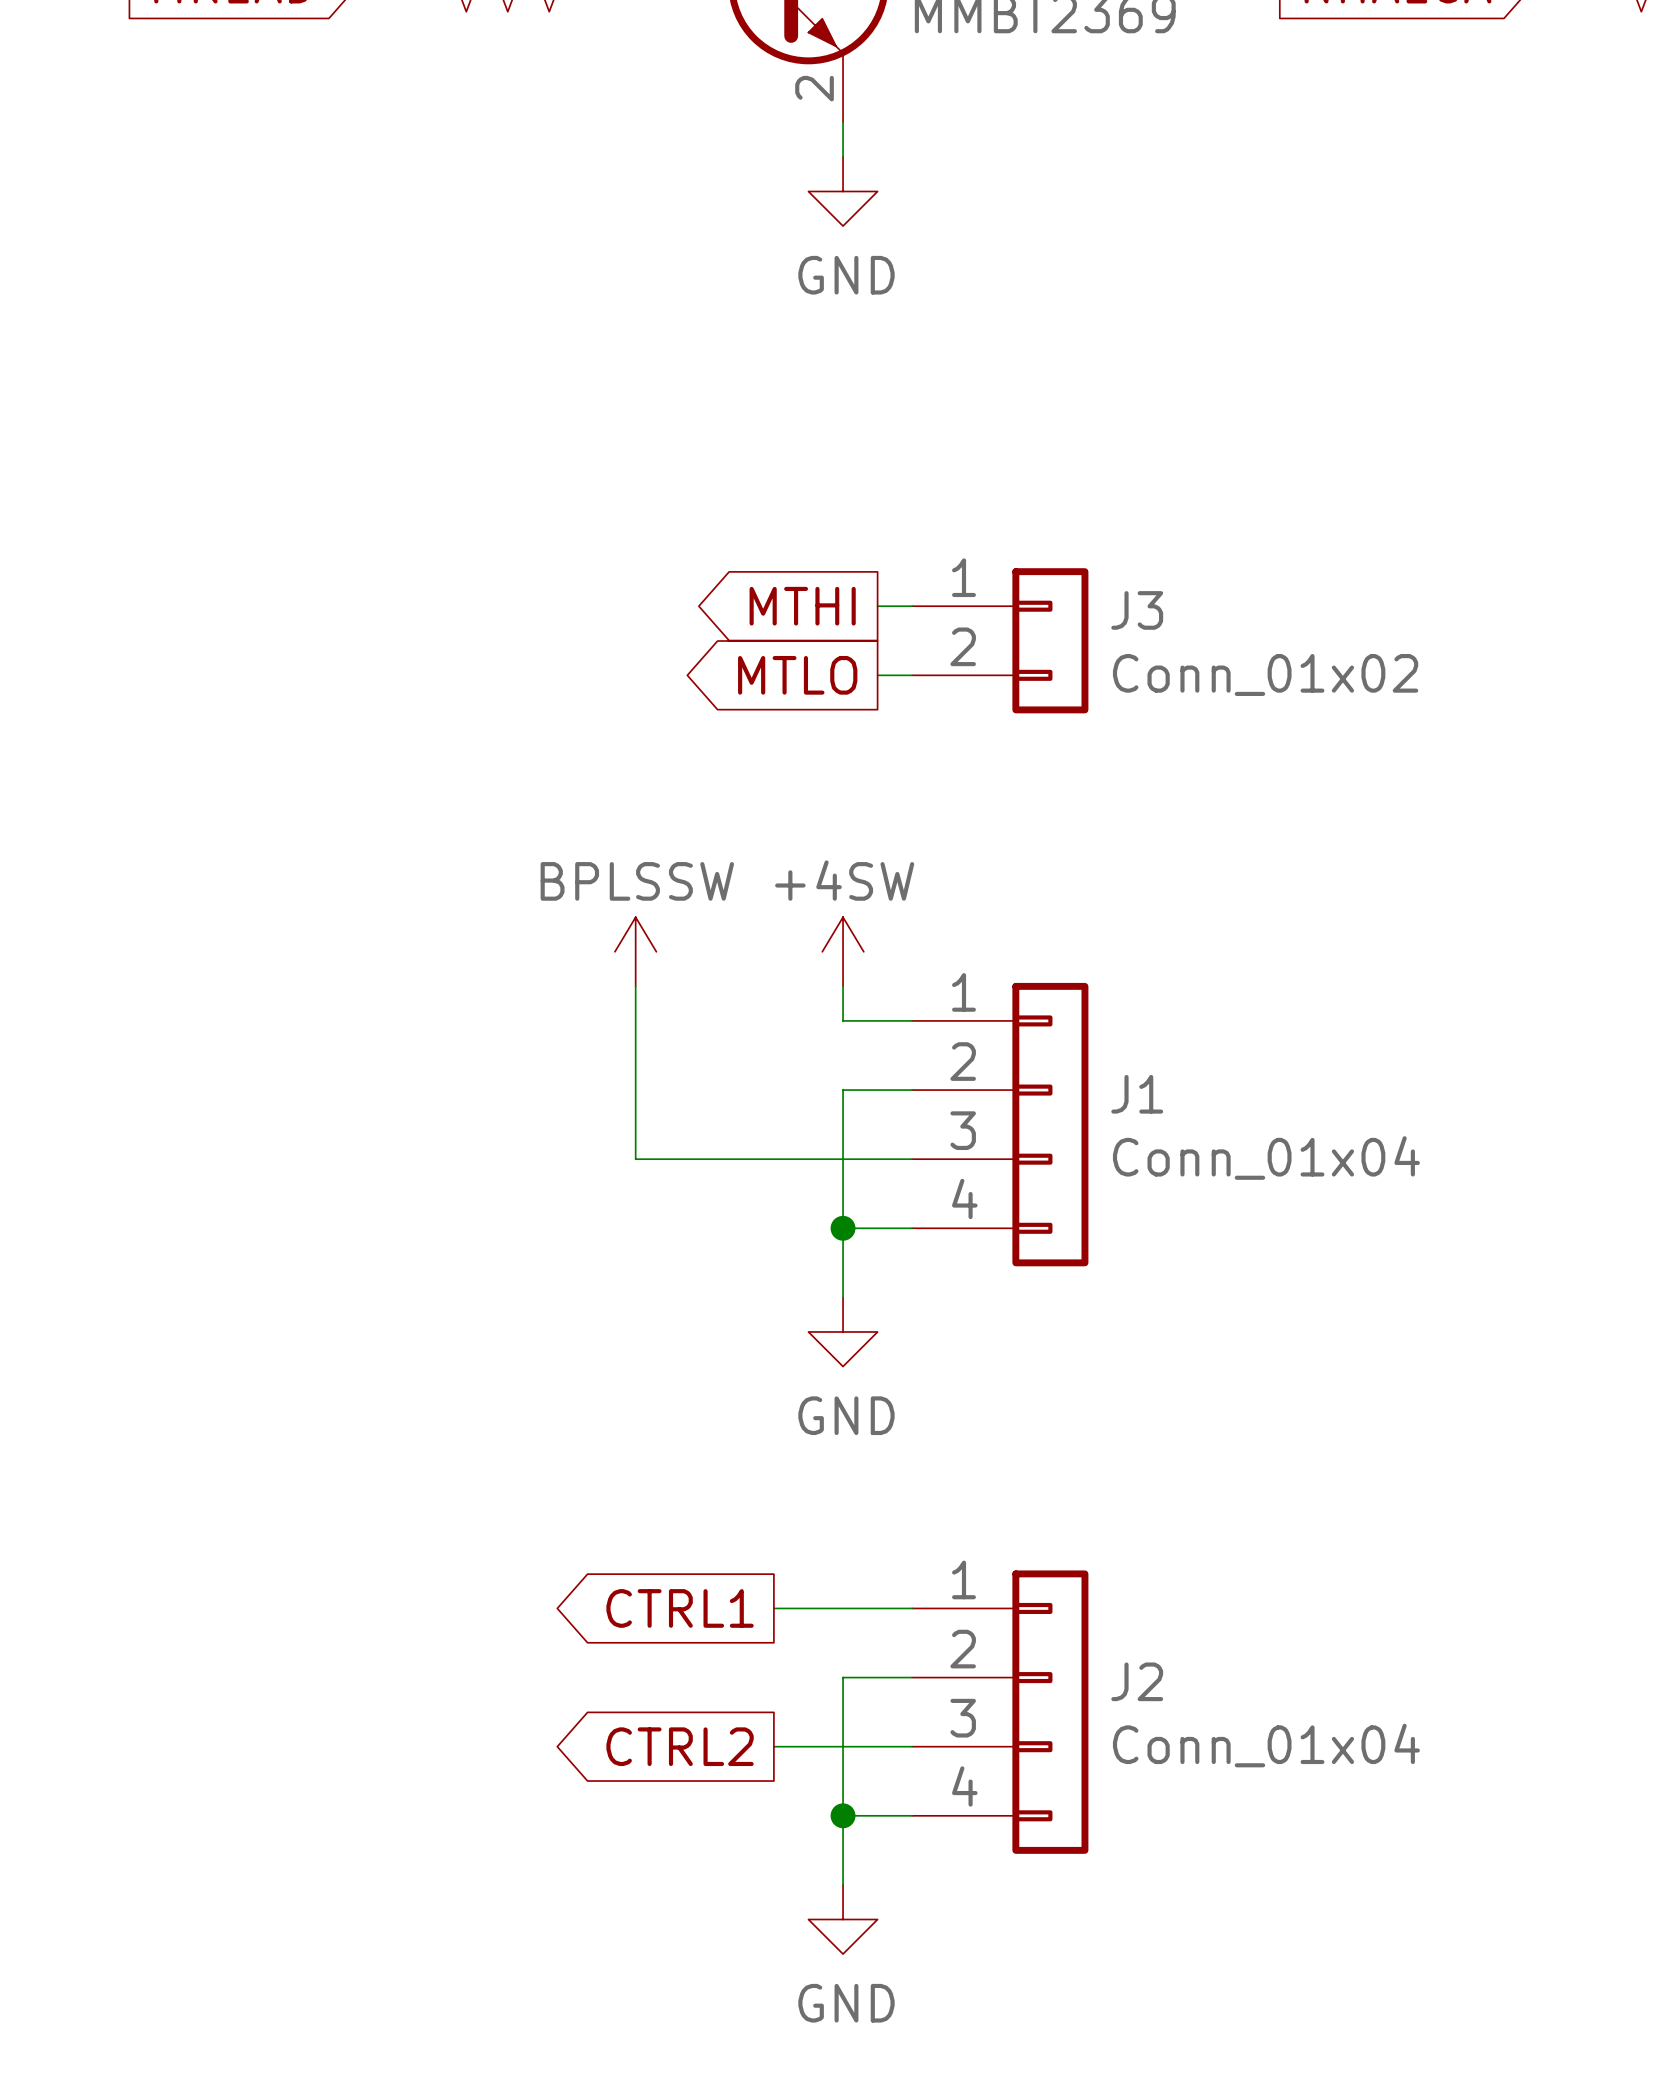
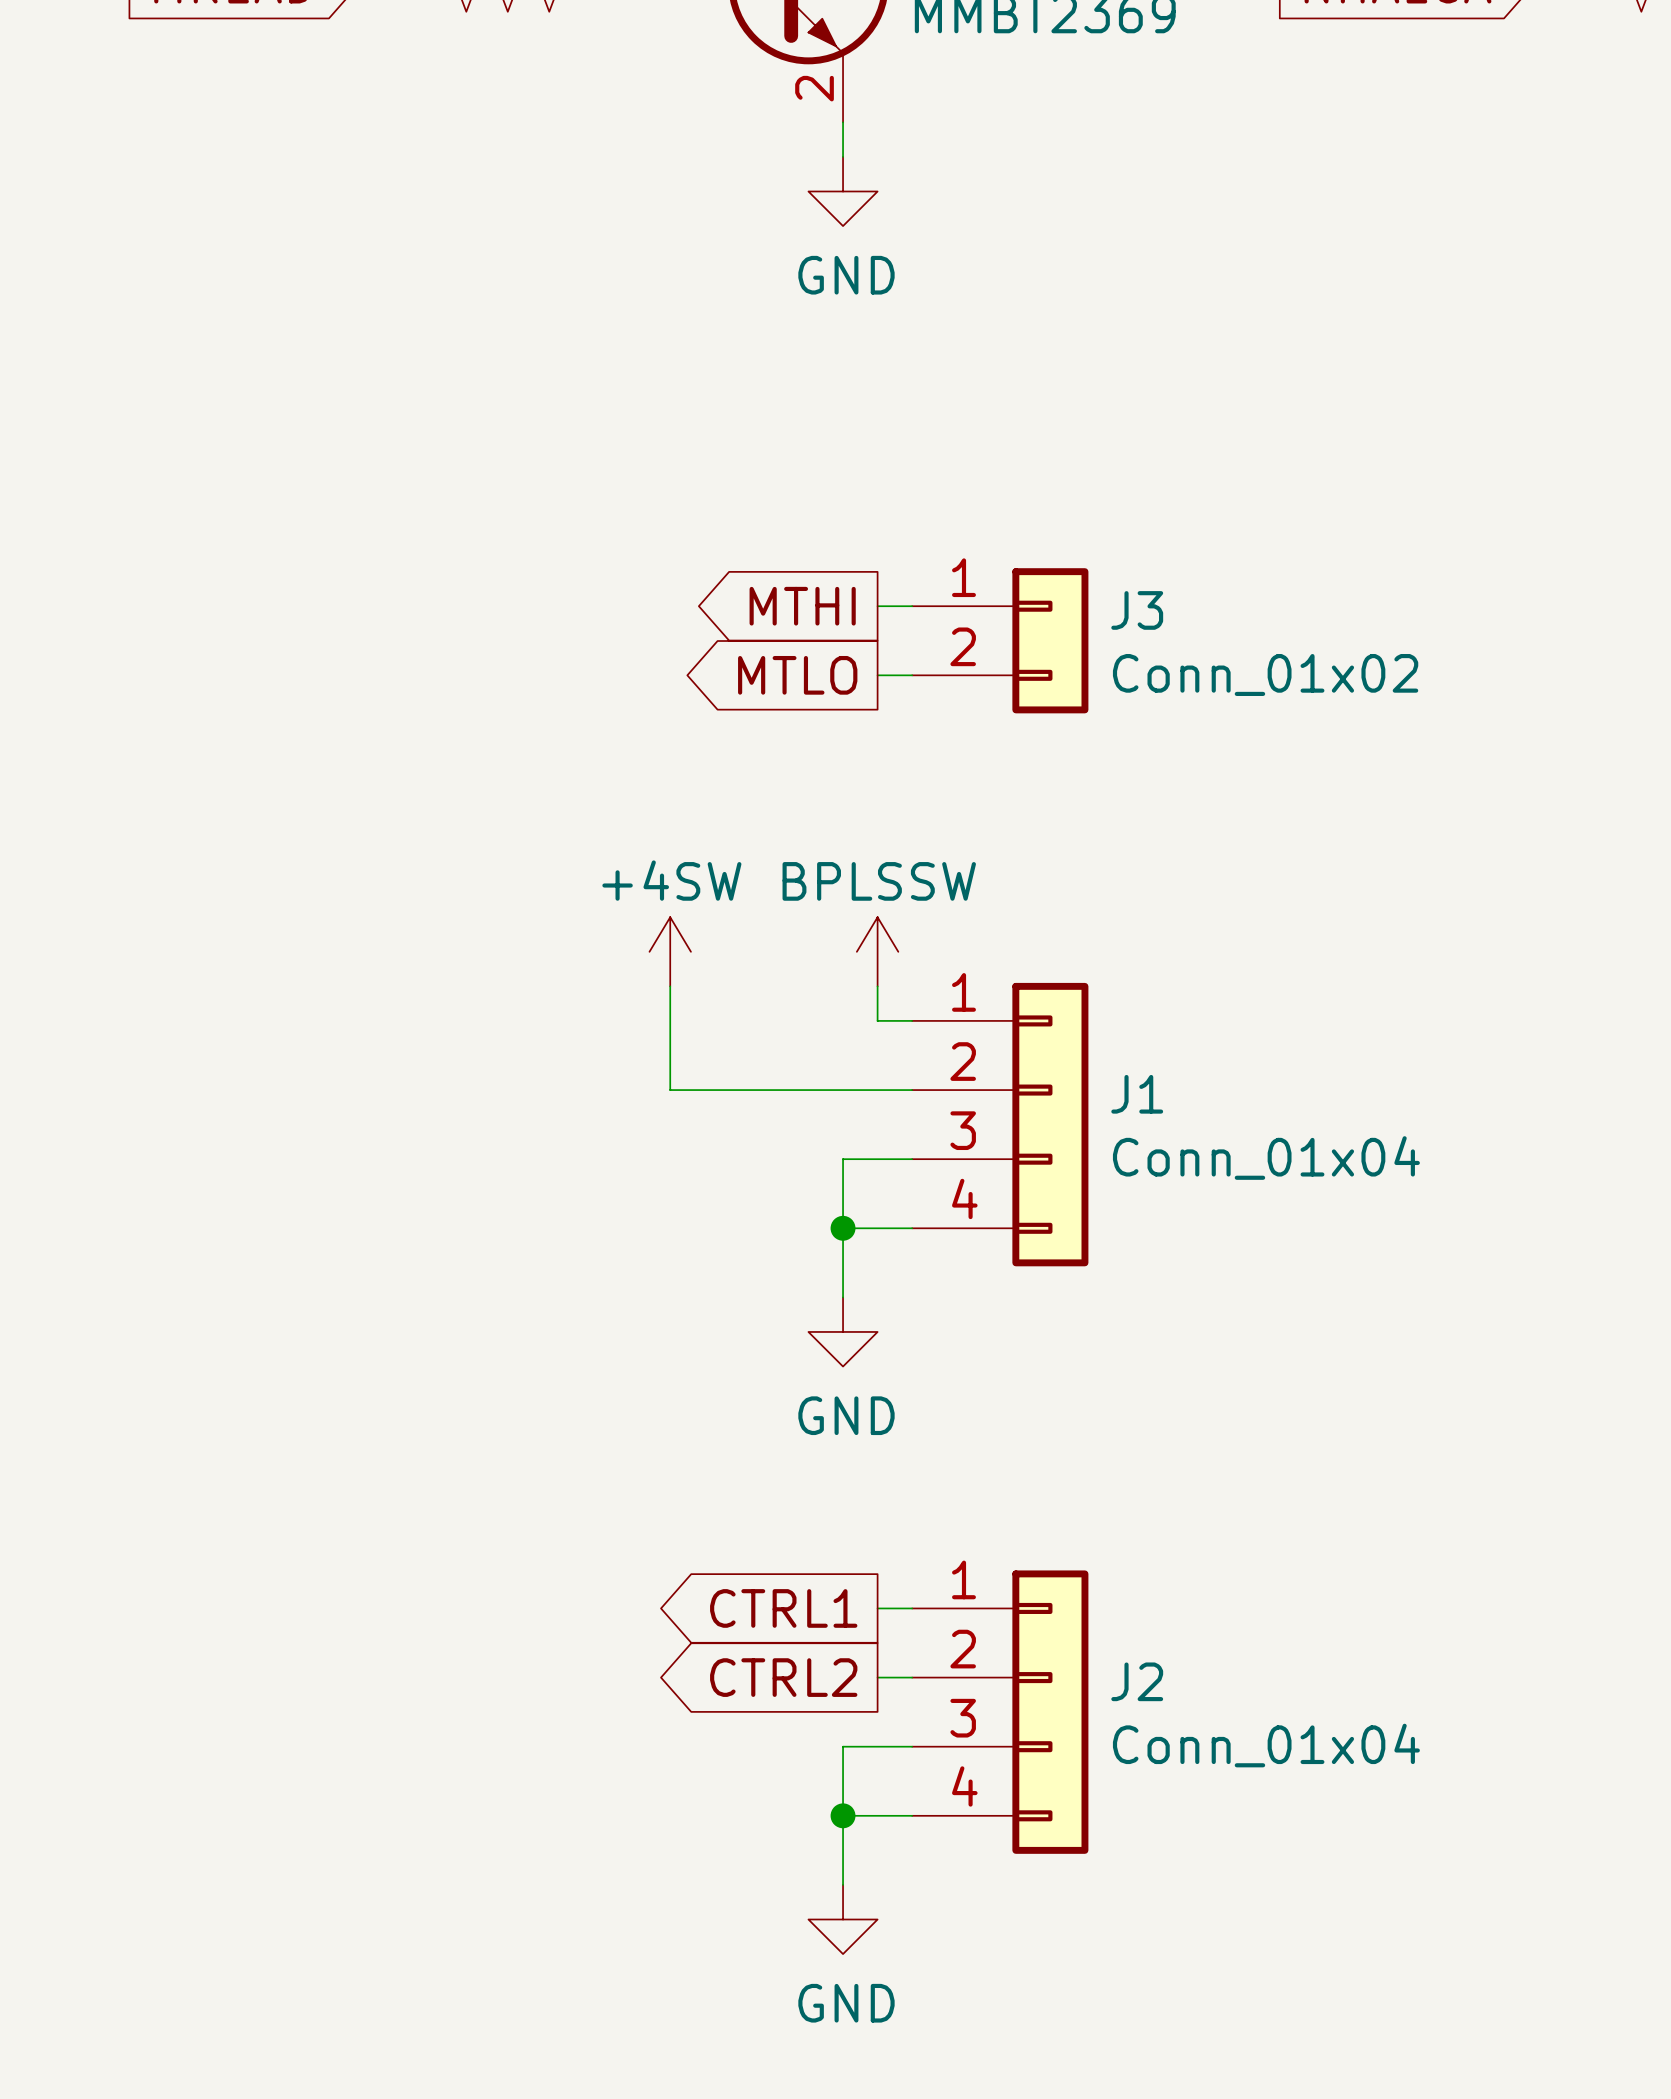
power symbol position: BPLSSW (635, 951) -> BPLSSW (877, 951)
power symbol position: +4SW (843, 951) -> +4SW (670, 951)
wire: (635, 986) (635, 1159) (843, 1159) (843, 1090) -> (670, 986) (670, 1090) (843, 1090)
wire: (843, 986) (843, 1020) (877, 1020) -> (877, 986) (877, 1020)
global label position: CTRL1 (680, 1608) -> CTRL1 (783, 1608)
wire: (773, 1608) (877, 1608) -> none
wire: (877, 1677) (843, 1677) (843, 1746) (773, 1746) -> none
global label position: CTRL2 (680, 1746) -> CTRL2 (783, 1677)

